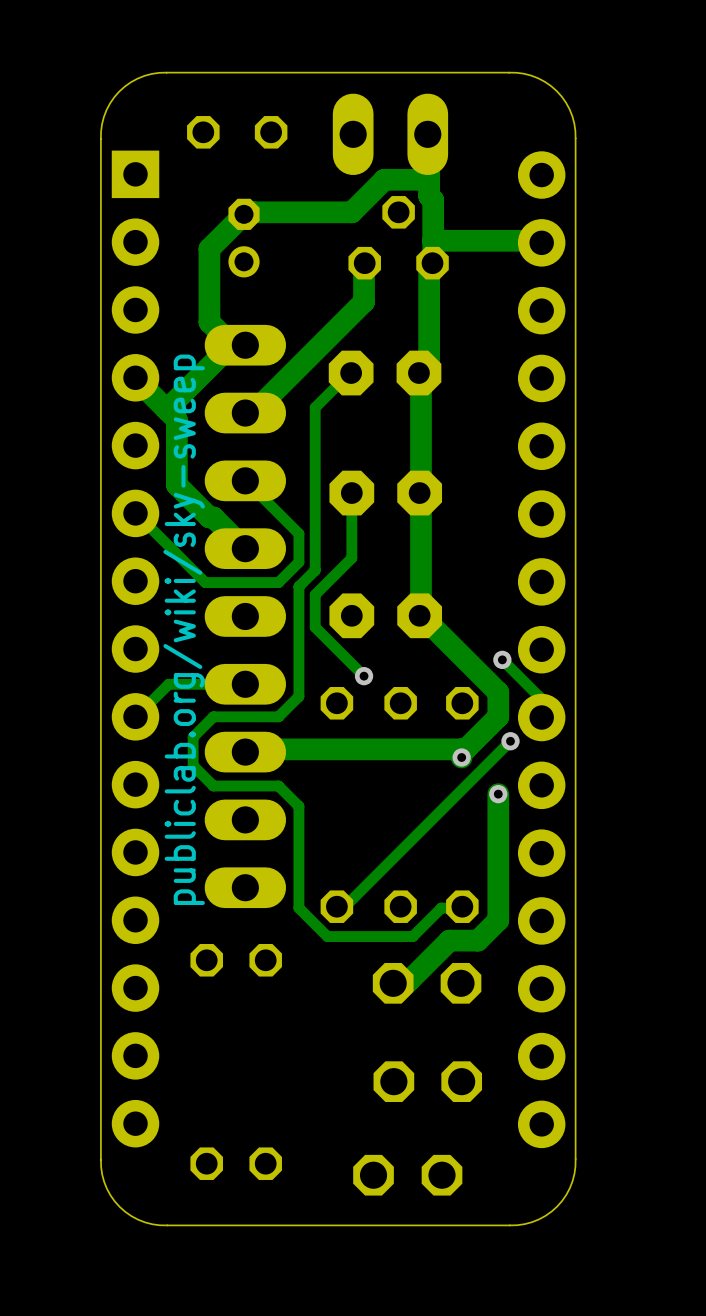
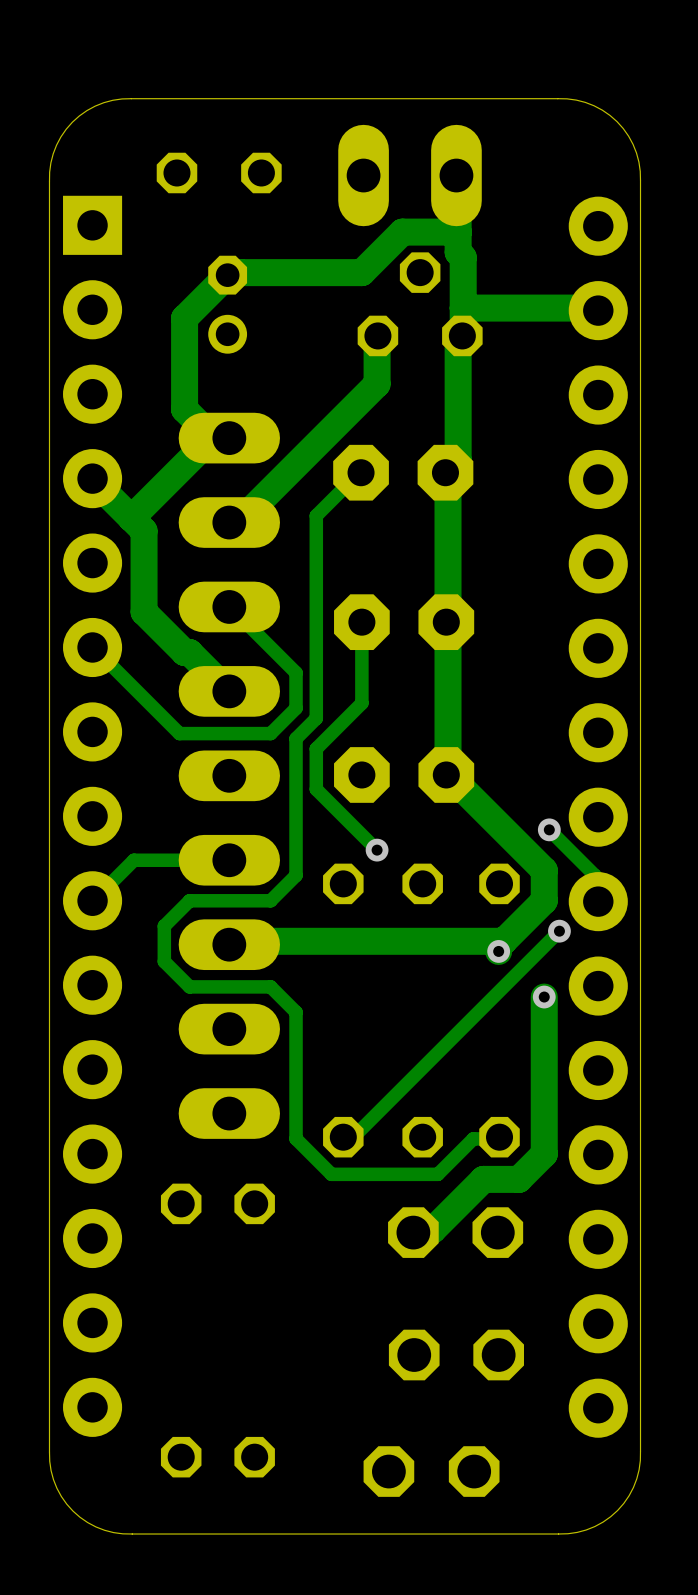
text: publiclab.org/wiki/sky-sweep (184, 629) -> none

